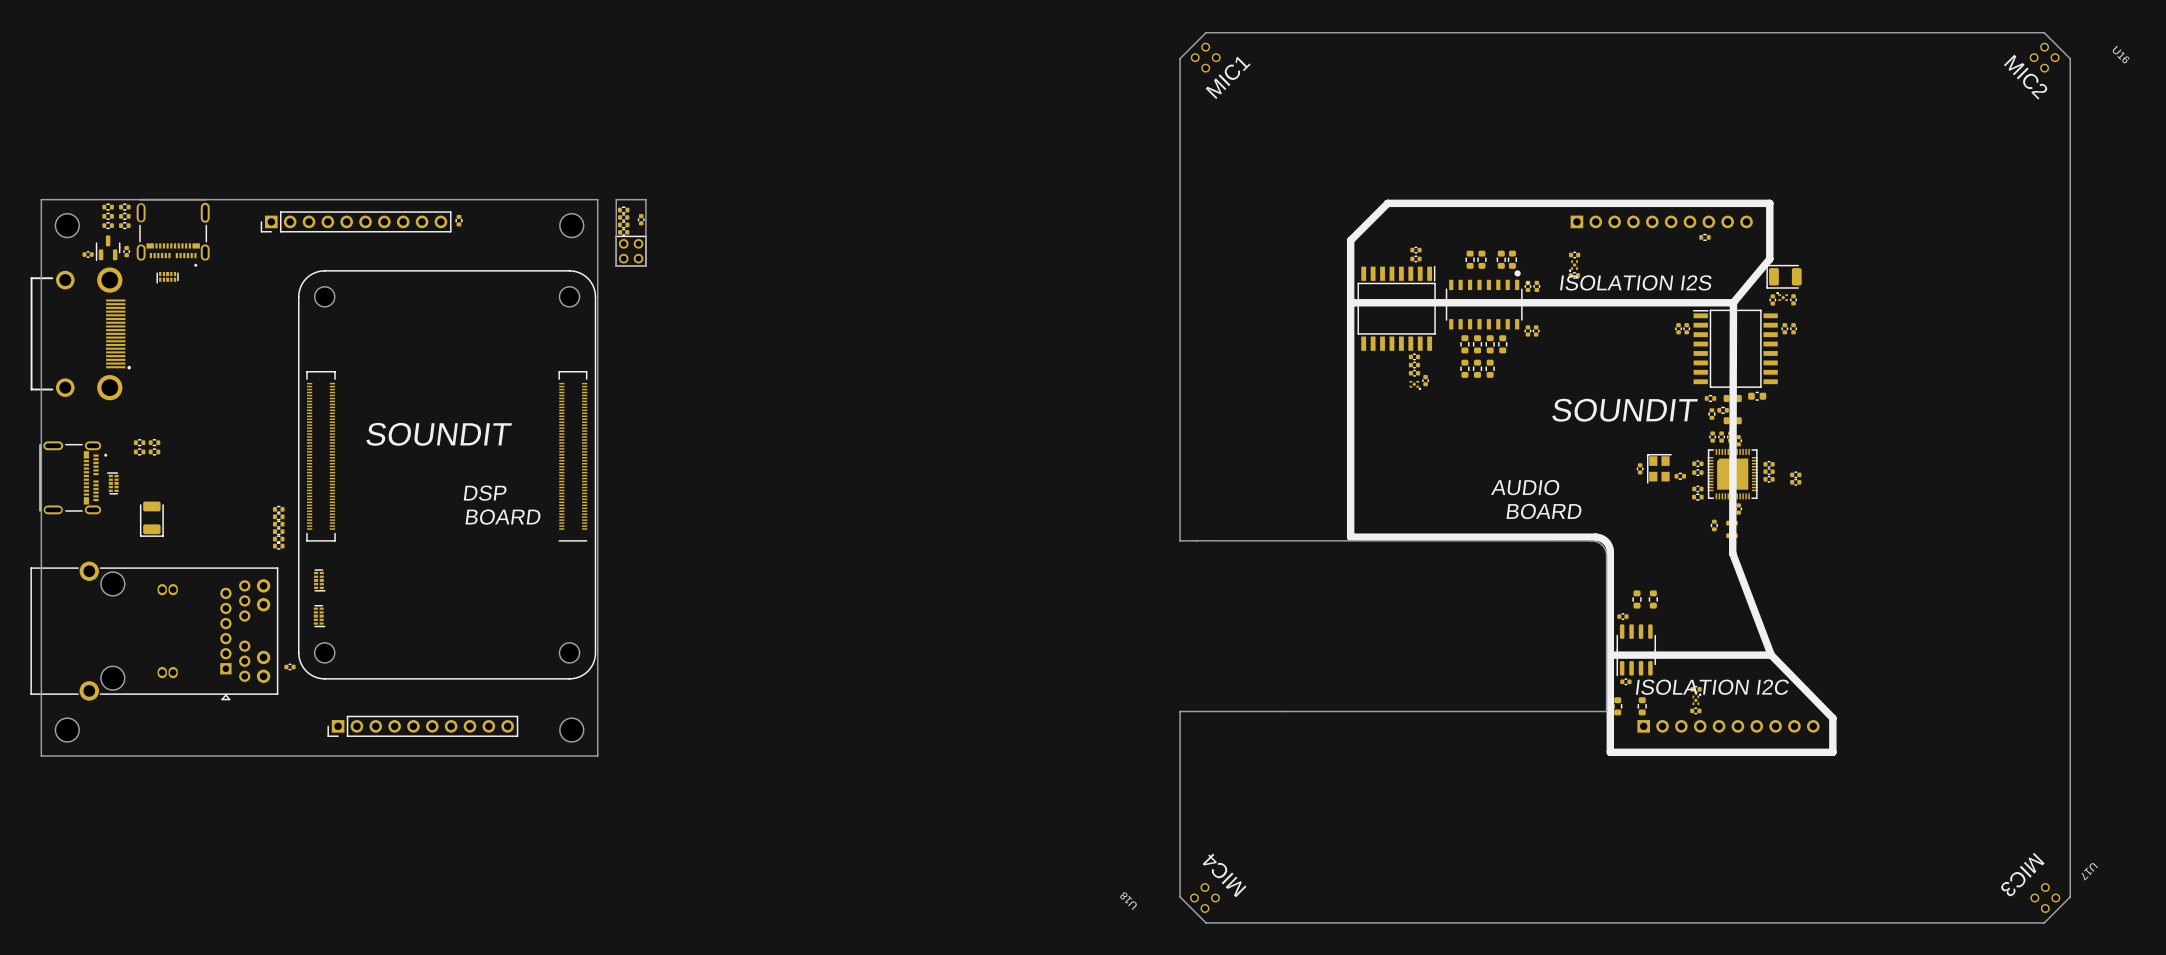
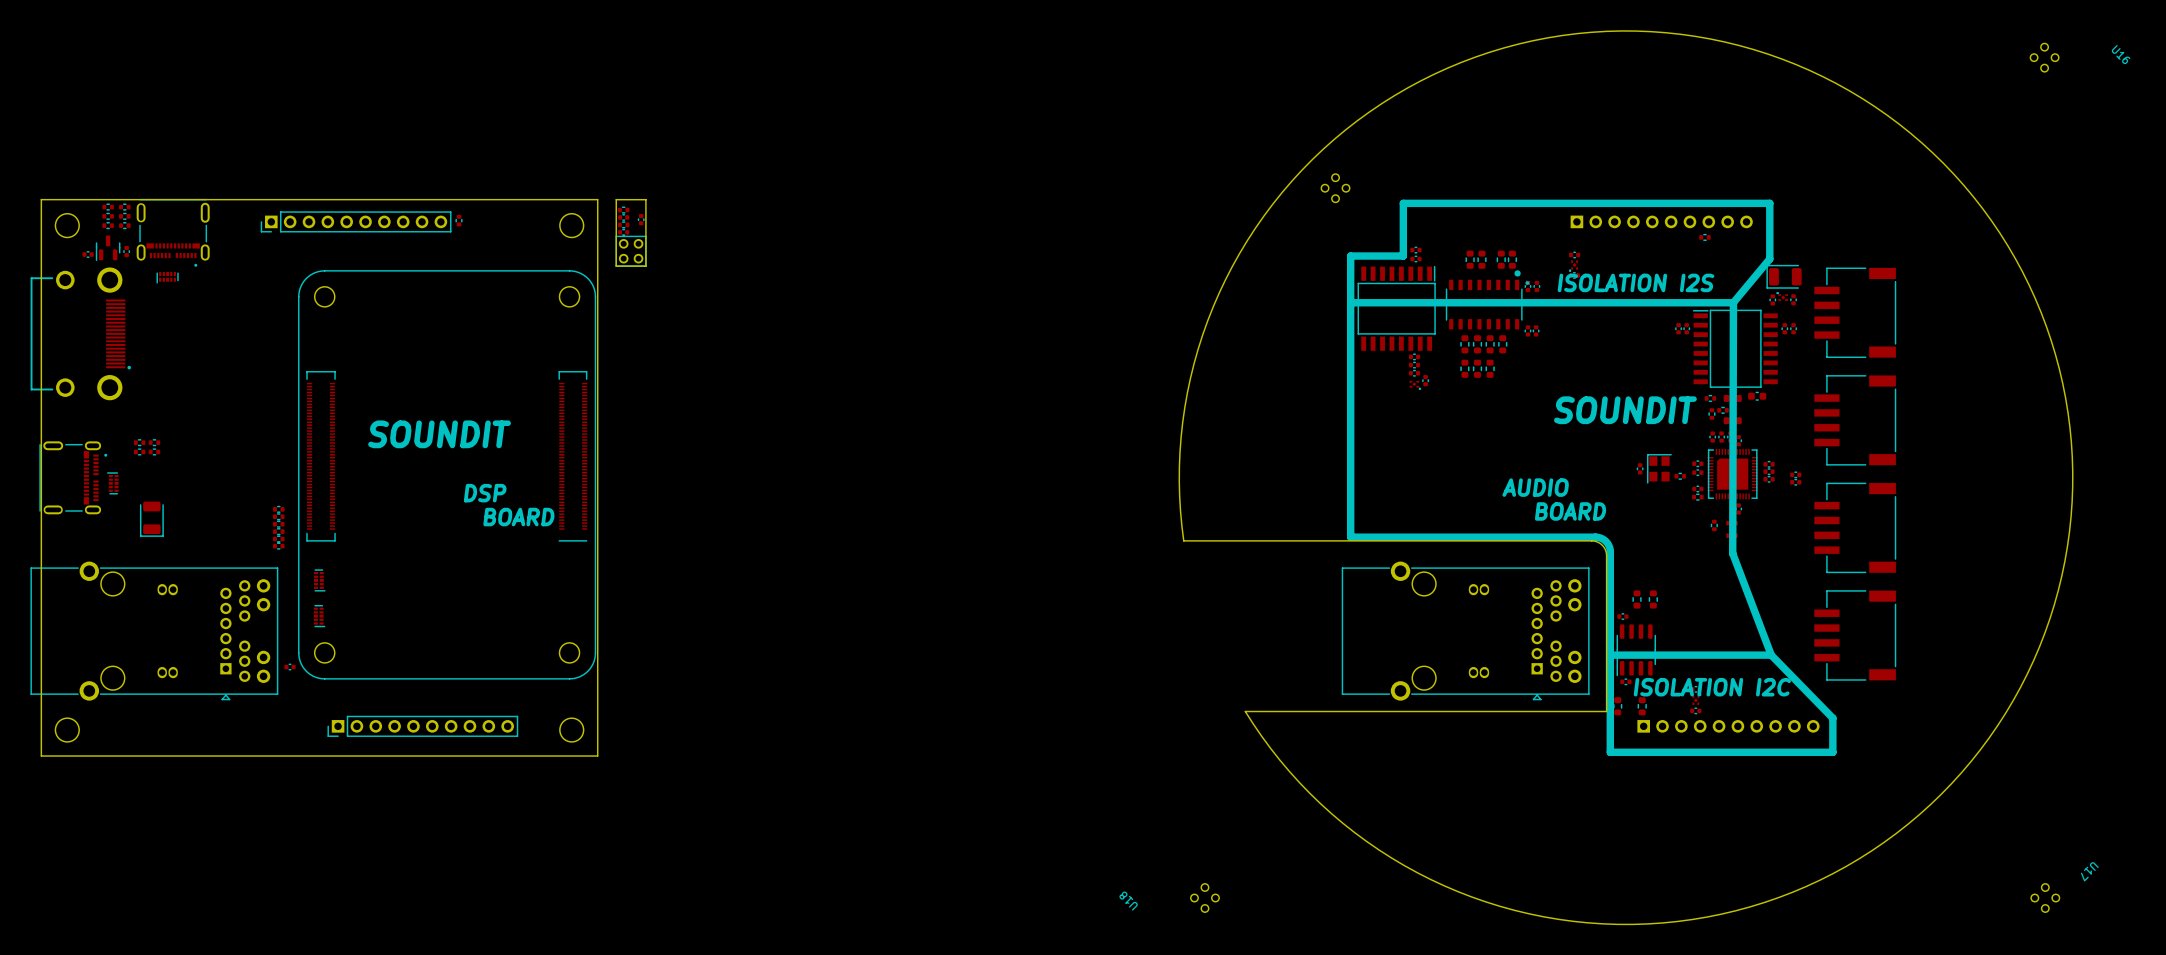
part position: (1205, 57) -> (1335, 188)
text: MIC1 (1228, 77) -> none
text: MIC2 (2025, 77) -> none
line: (1403, 203) (1387, 203) (1350, 240) (1350, 256) -> (1403, 203) (1403, 256) (1350, 256)
part: none -> (1855, 312)
part: none -> (1855, 420)
part: none -> (1855, 527)
board edge: (1591, 540) (1180, 540) (1180, 58) (1206, 32) (2044, 32) (2070, 58) (2070, 896) (2044, 922) (1206, 922) (1180, 896) (1180, 711) (1245, 711) -> (1591, 540) (1183, 540) (1179, 481) (1184, 407) (1202, 334) (1232, 266) (1255, 228) (1282, 192) (1312, 159) (1345, 129) (1381, 103) (1420, 80) (1489, 52) (1532, 40) (1576, 33) (1621, 30) (1666, 32) (1710, 38) (1753, 49) (1795, 64) (1836, 83) (1886, 115) (1921, 142) (1953, 174) (1982, 208) (2007, 245) (2035, 298) (2055, 354) (2065, 397) (2072, 457) (2072, 501) (2067, 546) (2054, 604) (2039, 646) (2013, 700) (1989, 737) (1951, 783) (1919, 814) (1883, 842) (1833, 873) (1792, 892) (1750, 906) (1691, 919) (1632, 924) (1587, 922) (1528, 913) (1485, 901) (1444, 885) (1391, 857) (1354, 832) (1309, 793) (1270, 748) (1245, 711)
part: none -> (1465, 631)
part: none -> (1855, 635)
text: MIC3 (2022, 874) -> none
text: MIC4 (1224, 875) -> none

